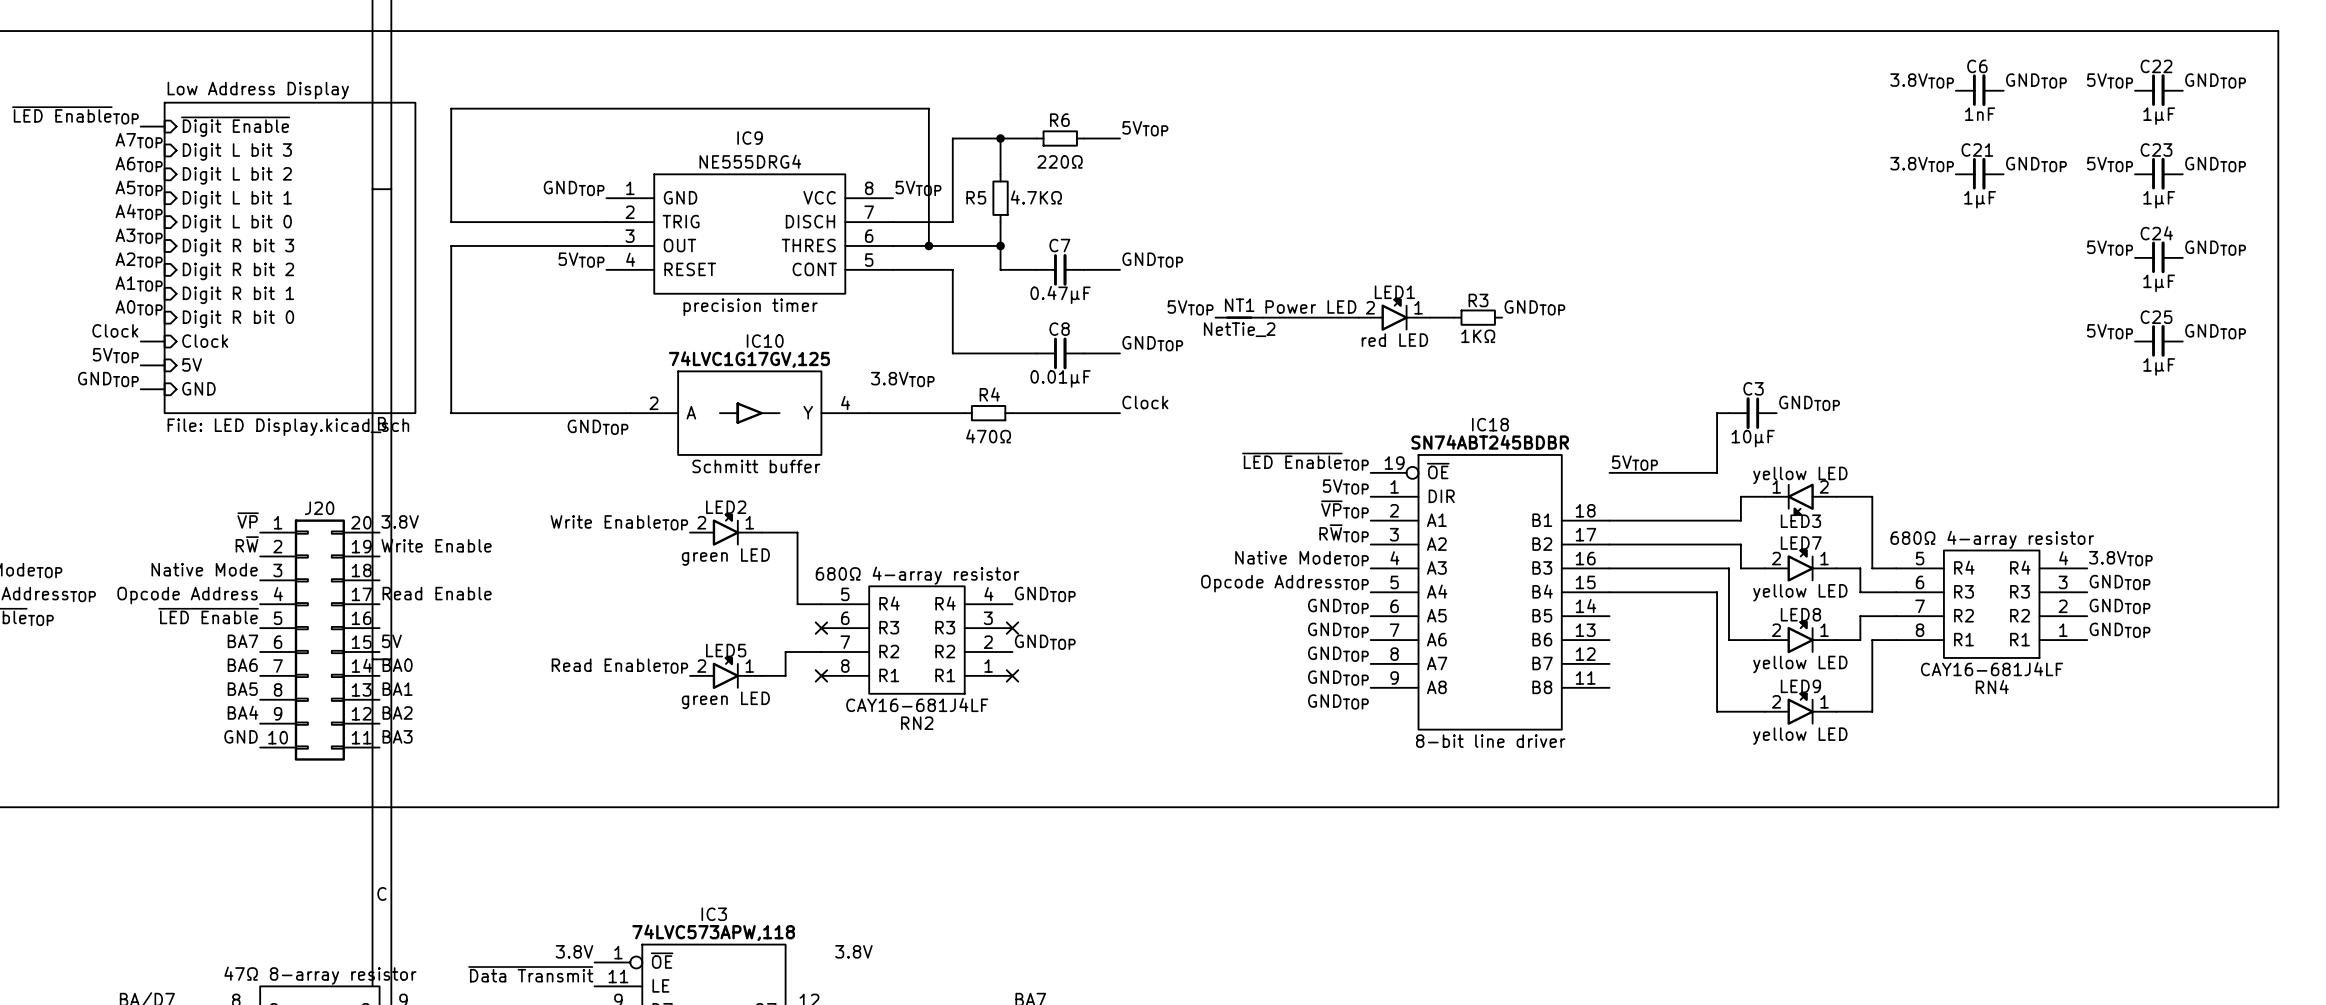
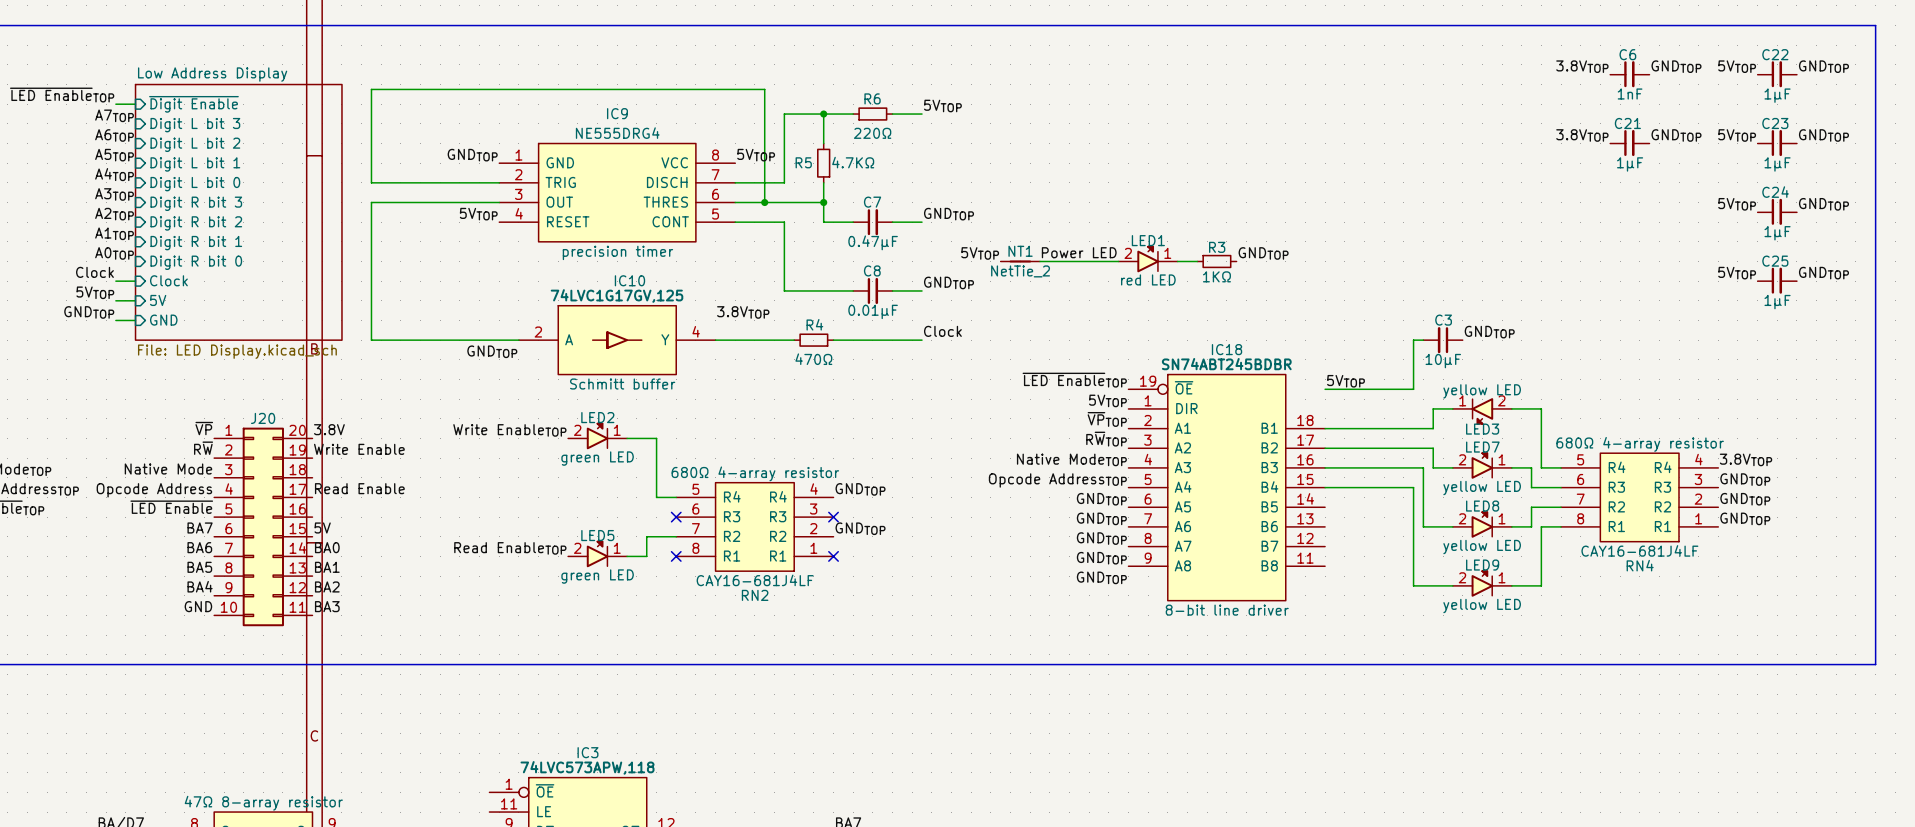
label: 3.8V (574, 951) -> none
label: 3.8V (853, 951) -> none
label: ~{Data Transmit} (530, 974) -> none

